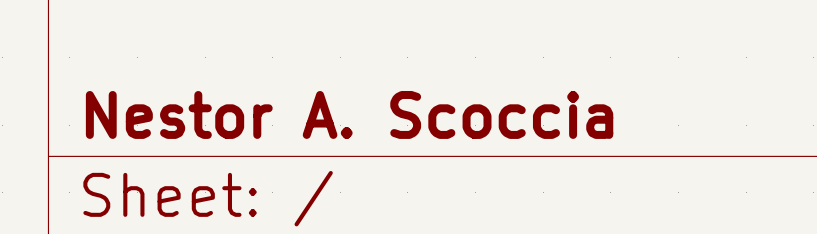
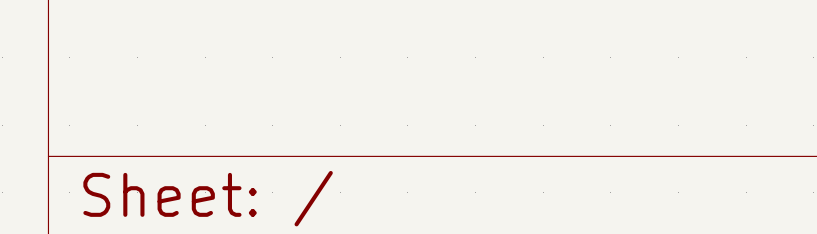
title block: Nestor A. Scoccia (349, 114) -> none

